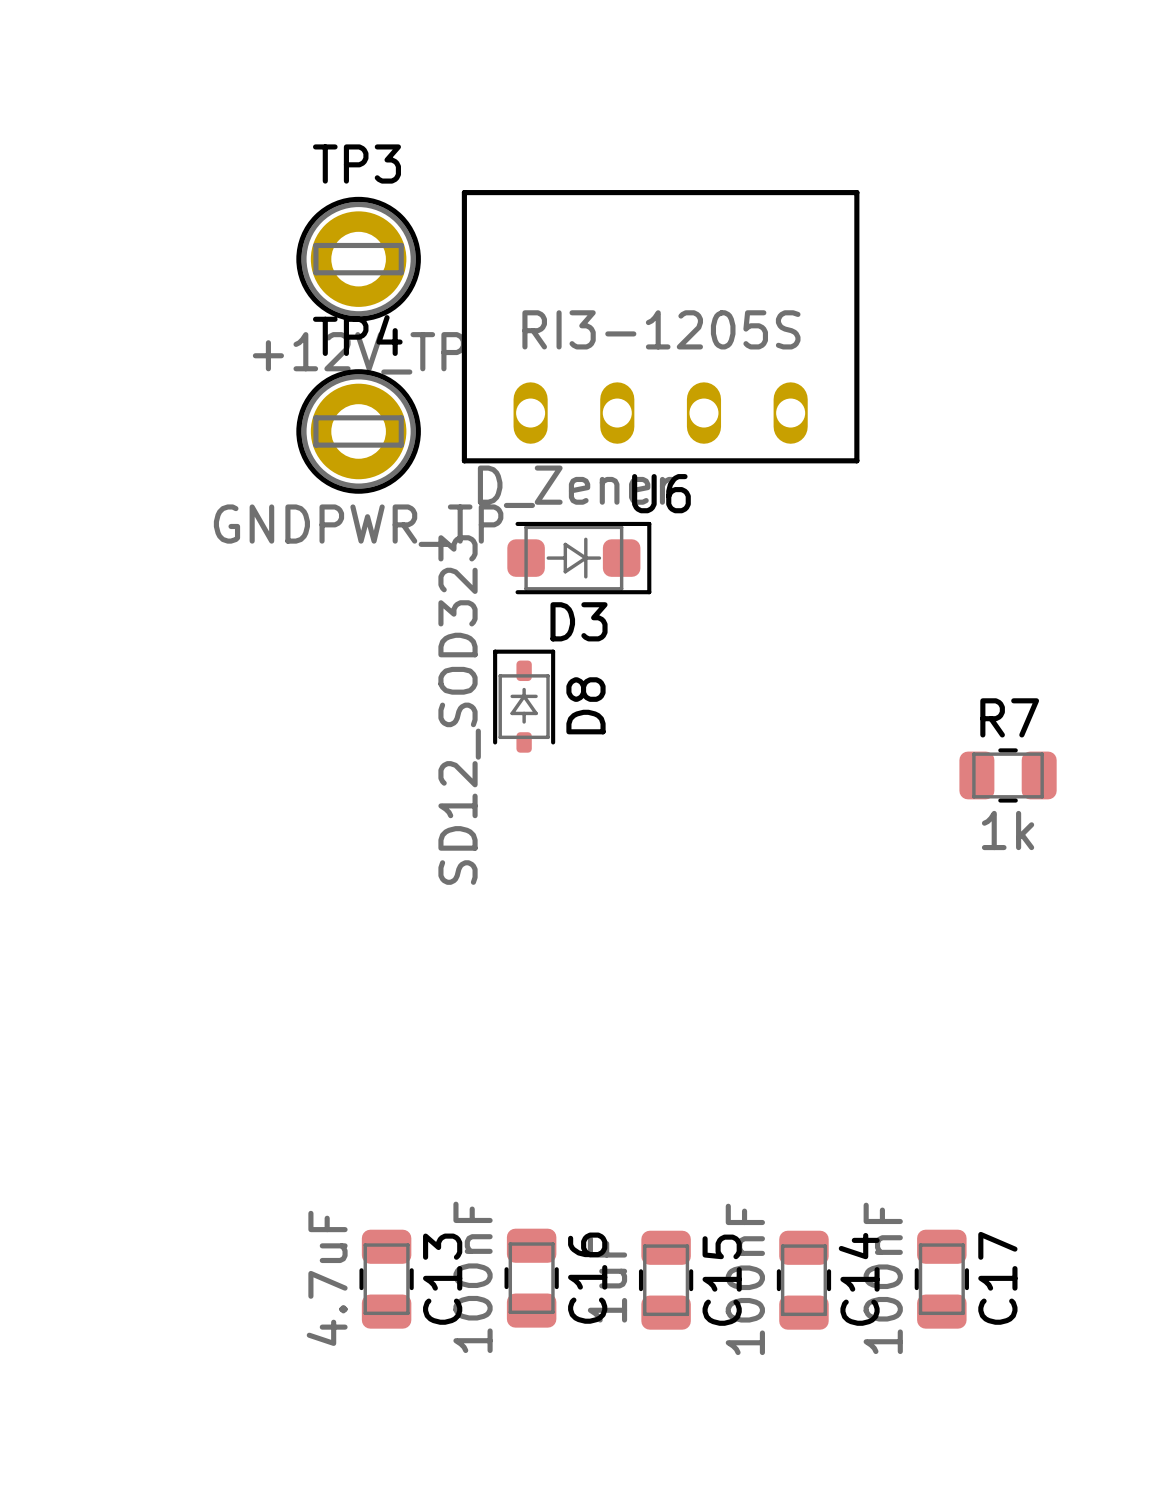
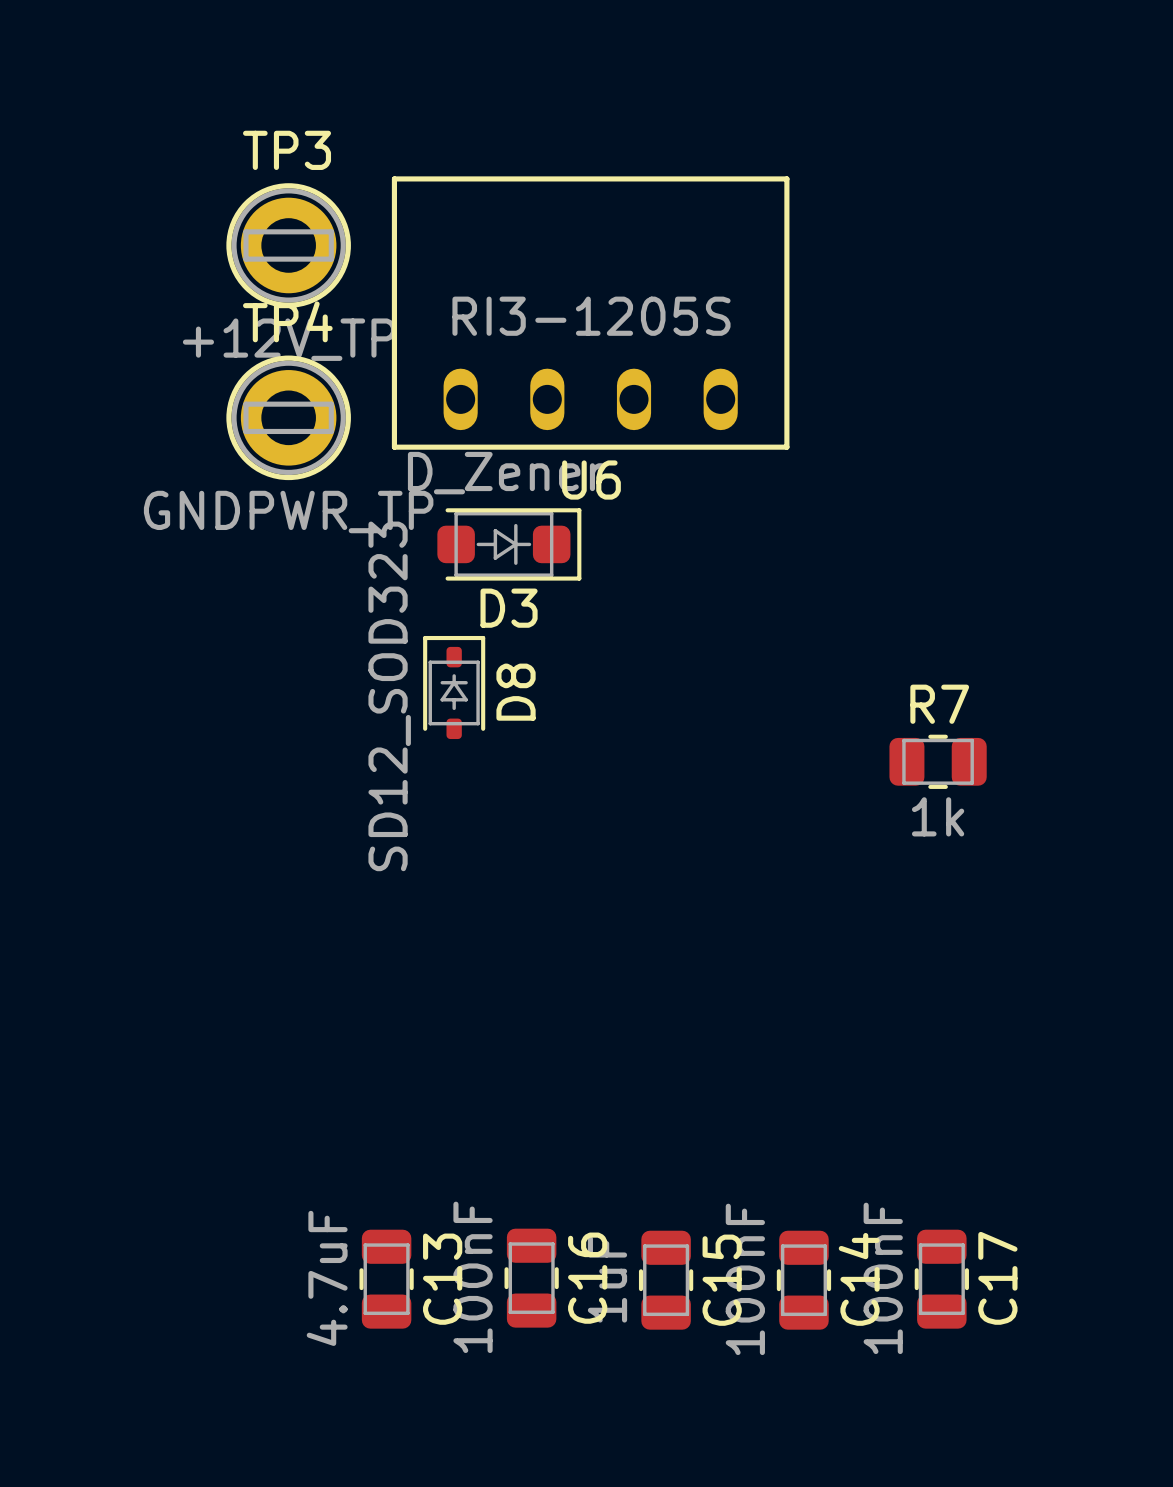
TP3 position: (358, 259) -> (288, 245)
U6 position: (660, 326) -> (590, 313)
TP4 position: (358, 431) -> (288, 417)
D3 position: (579, 558) -> (509, 544)
D8 position: (524, 701) -> (454, 687)
R7 position: (1008, 775) -> (938, 761)

